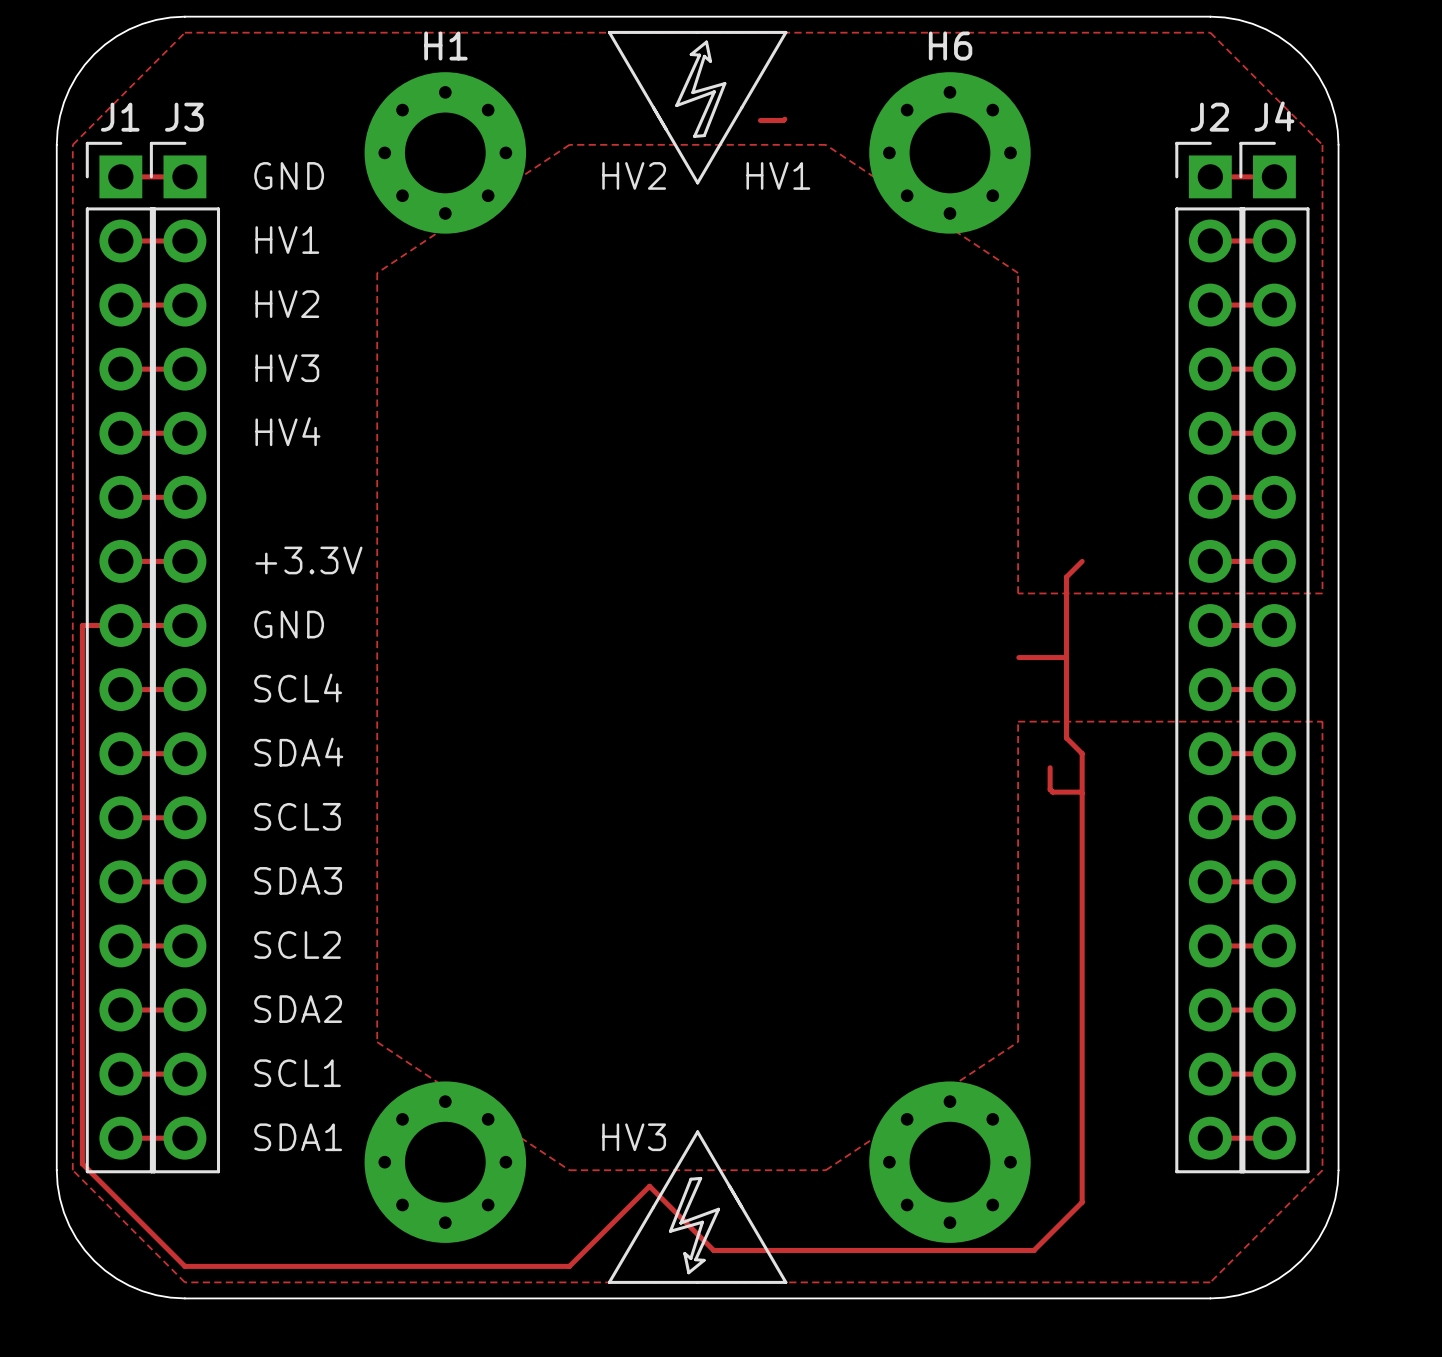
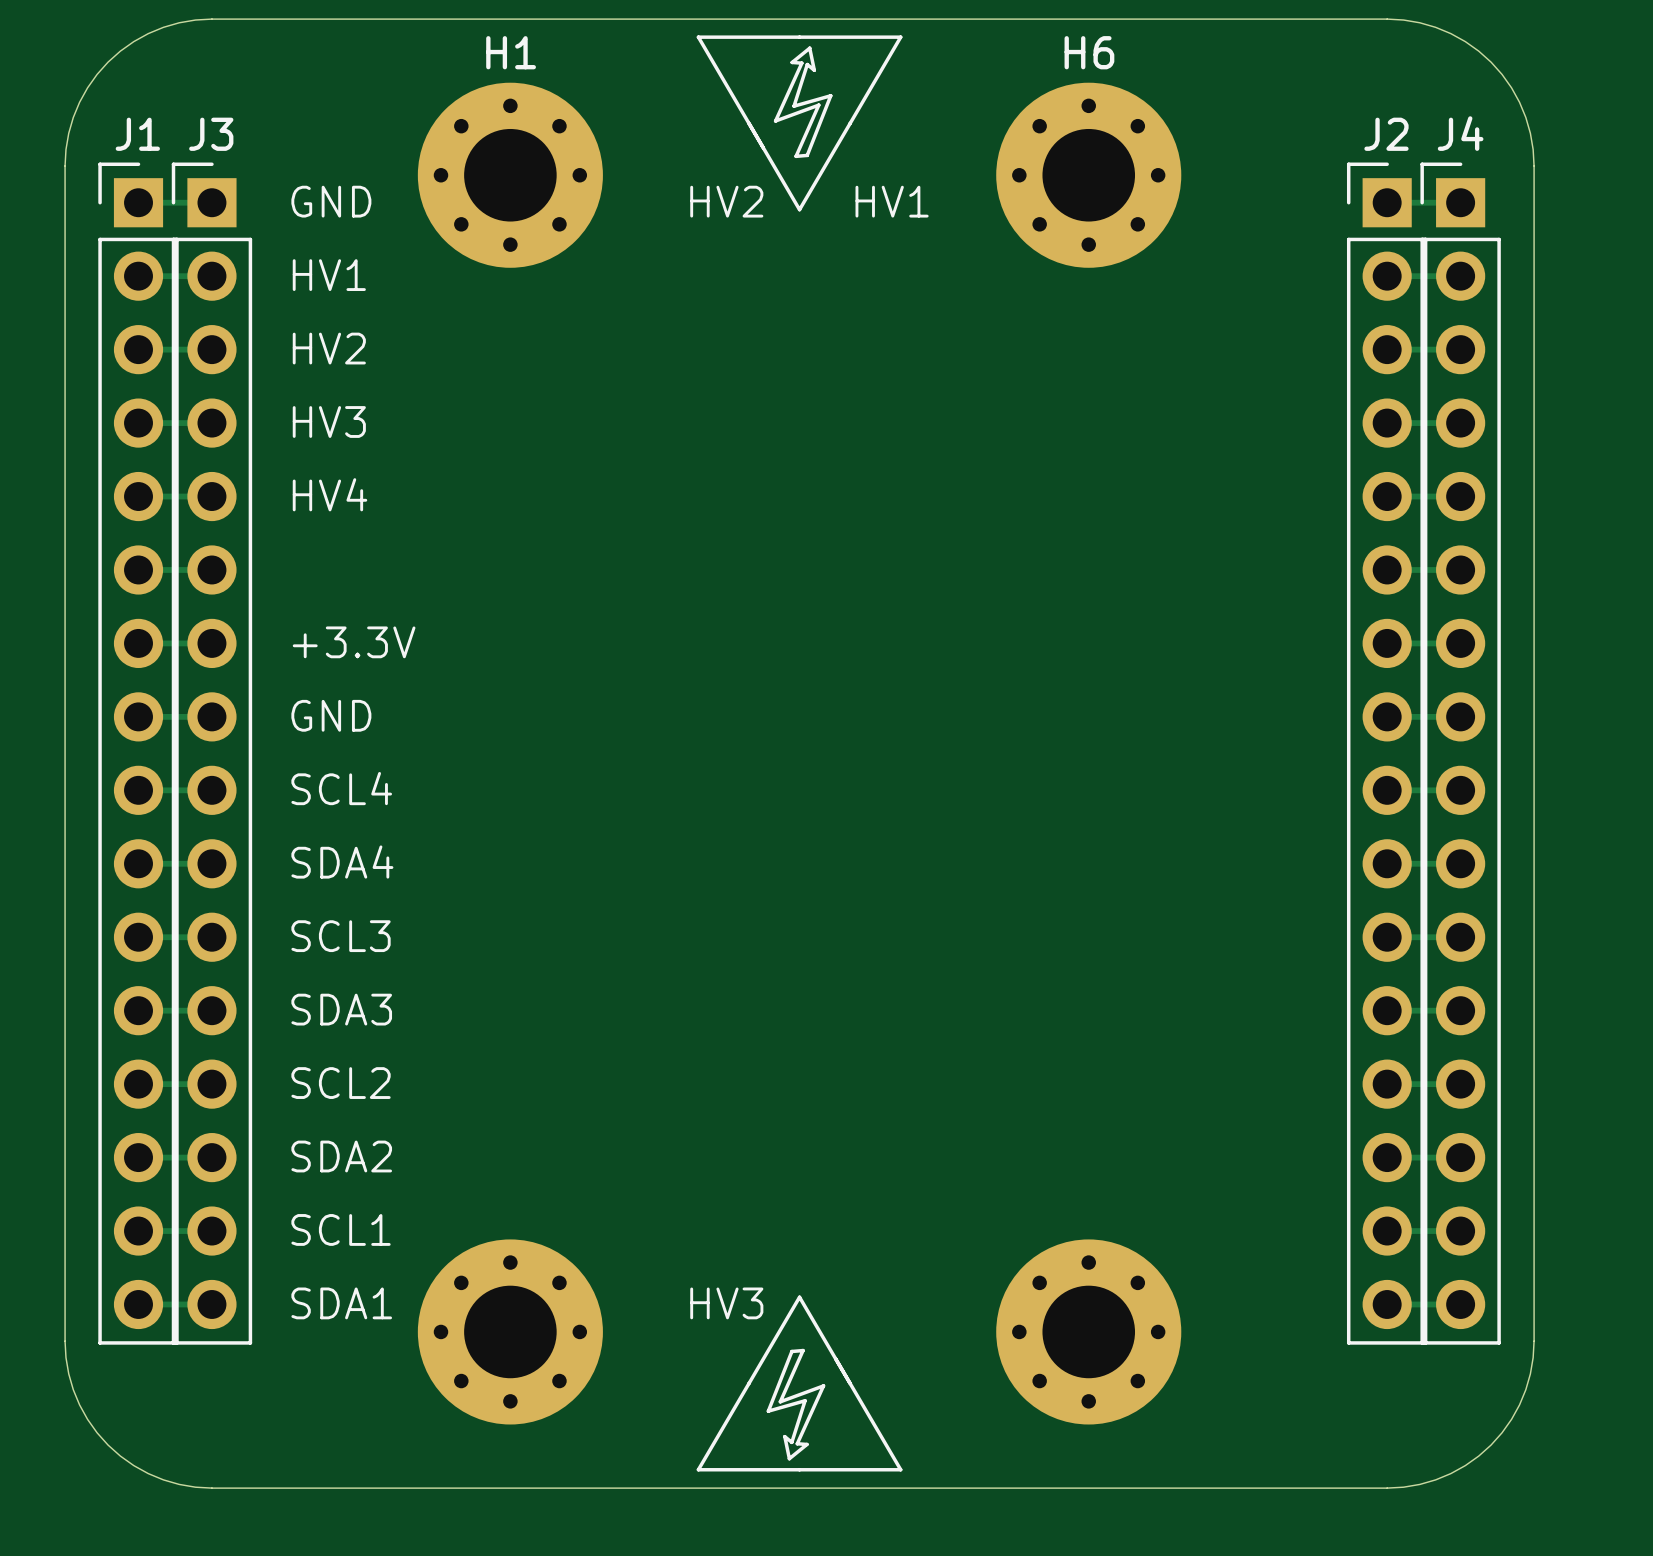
zone outline: (184, 32) (72, 144) (72, 1170) (184, 1282) (1210, 1282) (1322, 1170) (1322, 721) (1018, 721) (1018, 1042) (825, 1170) (569, 1170) (377, 1042) (377, 273) (569, 144) (825, 144) (1018, 273) (1018, 593) (1322, 593) (1322, 144) (1210, 32) (184, 32) -> none
track: (784, 119) (760, 120) -> none
track: (1082, 561) (1066, 577) (1066, 738) (1082, 753) (1082, 1202) (1033, 1250) (713, 1250) (649, 1186) (569, 1266) (184, 1266) (82, 1163) (82, 625) (120, 625) -> none
track: (1018, 657) (1066, 657) -> none
track: (1050, 767) (1050, 789) (1052, 792) (1082, 793) -> none

